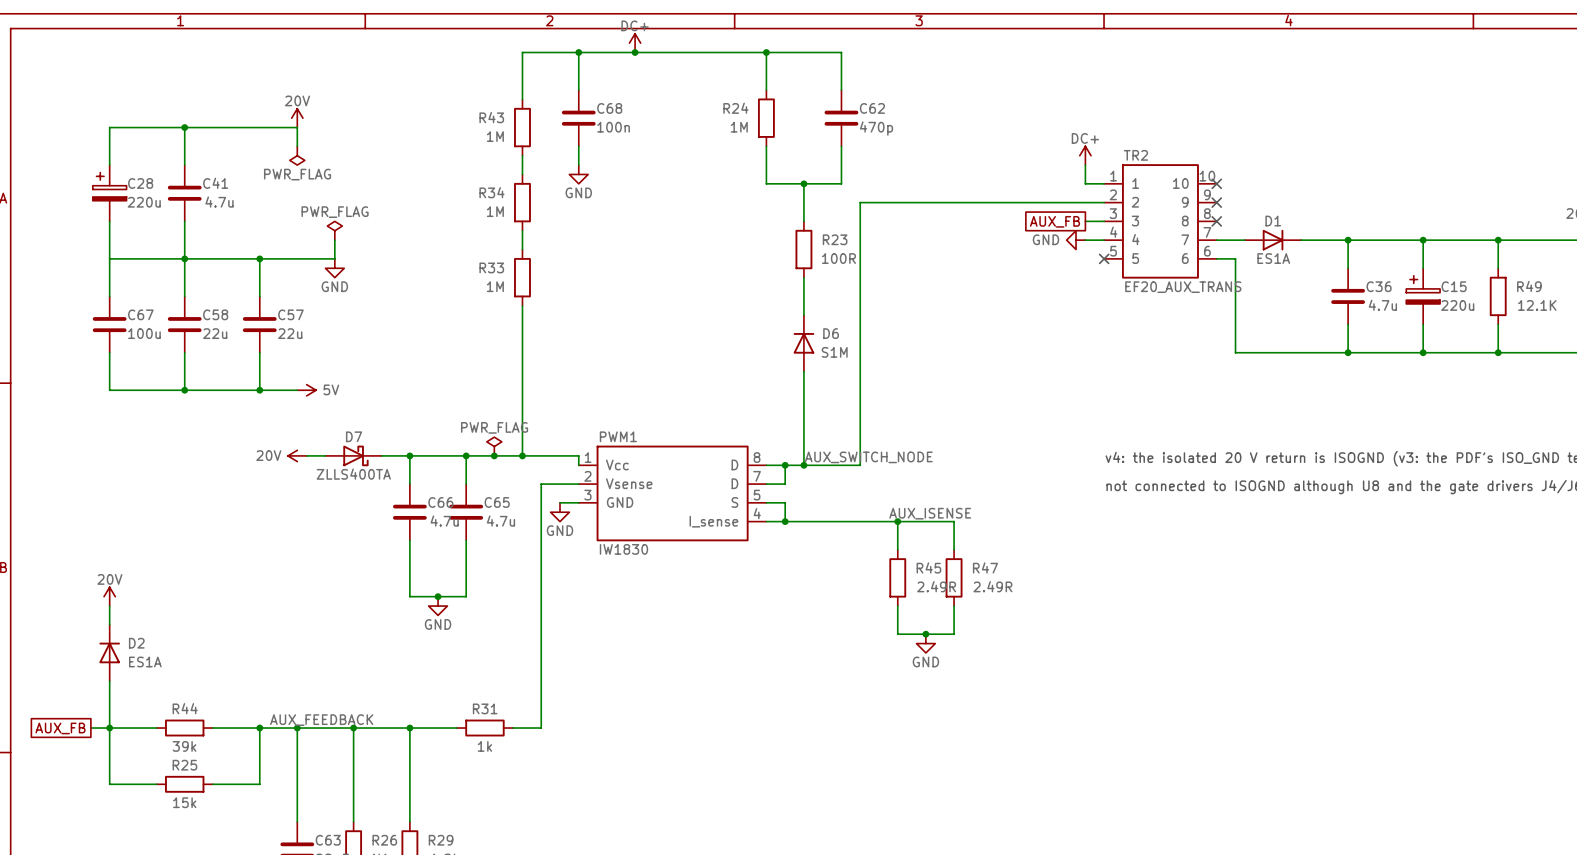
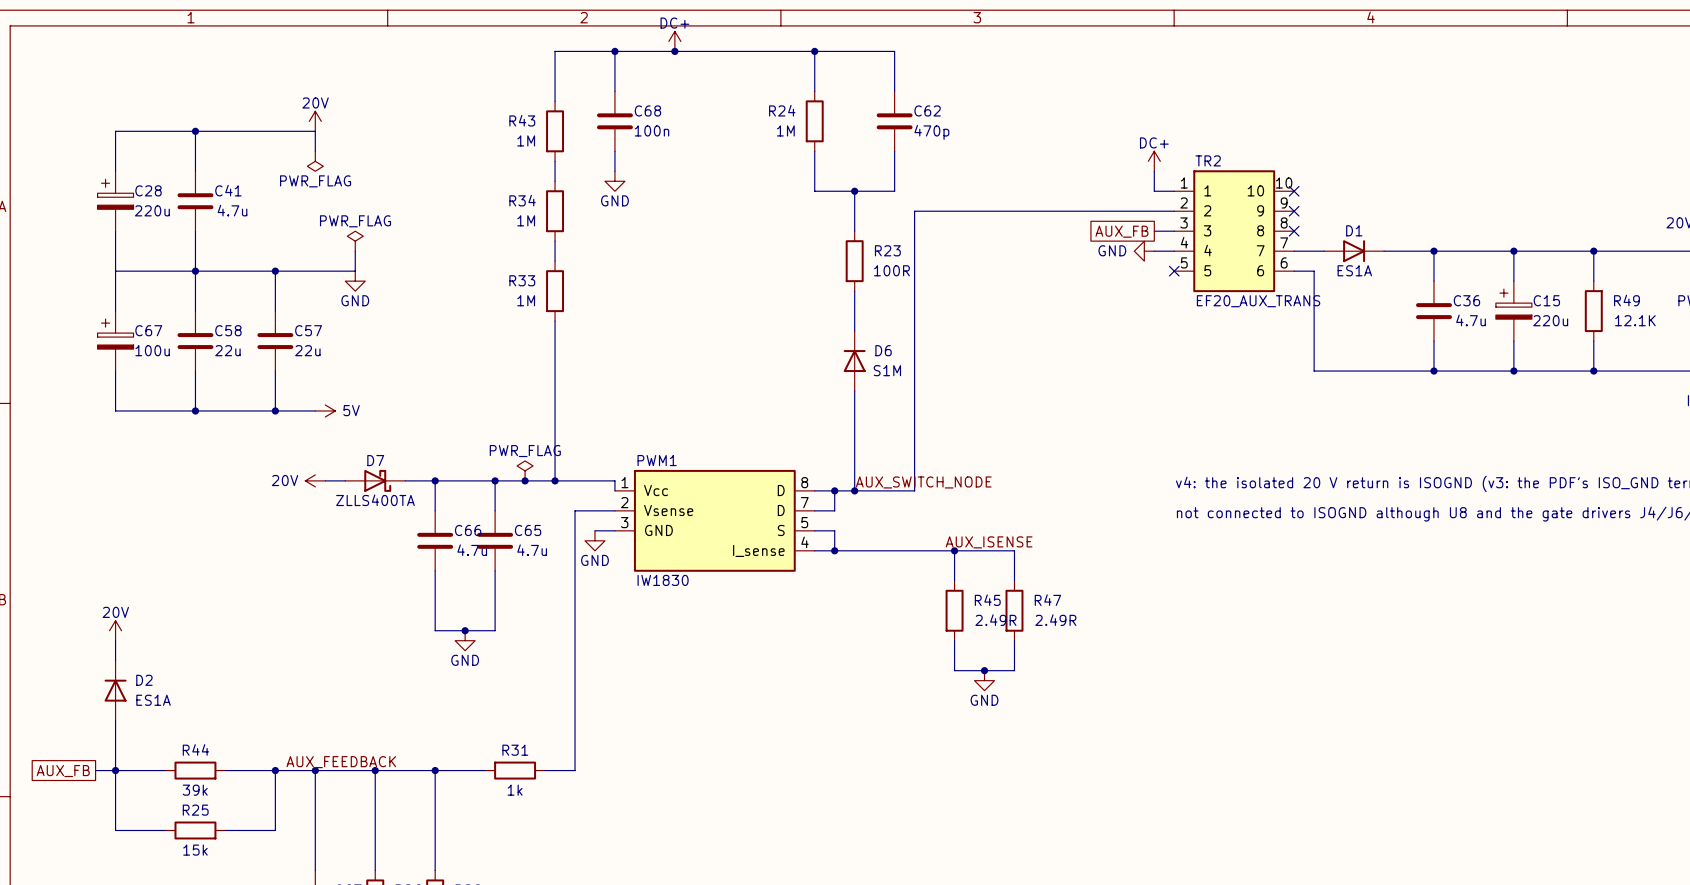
C67 symbol: [92, 296, 127, 353] -> [97, 311, 134, 372]

